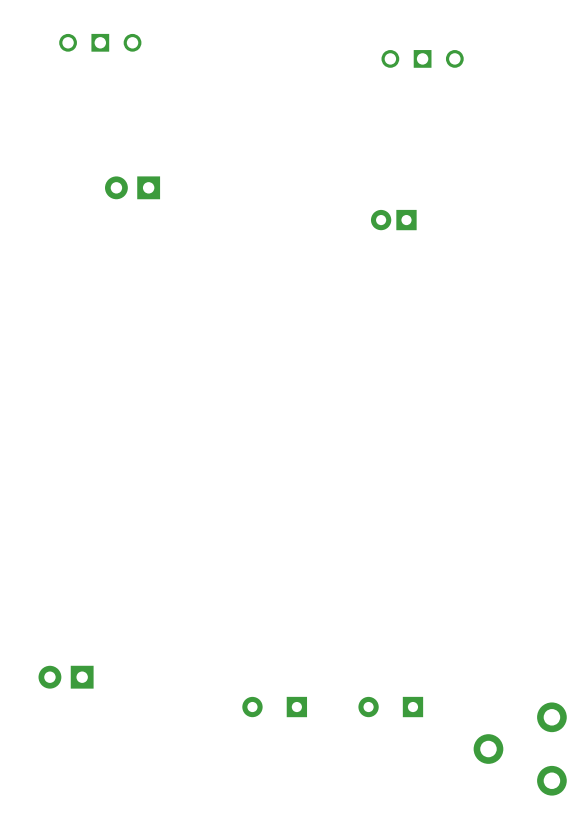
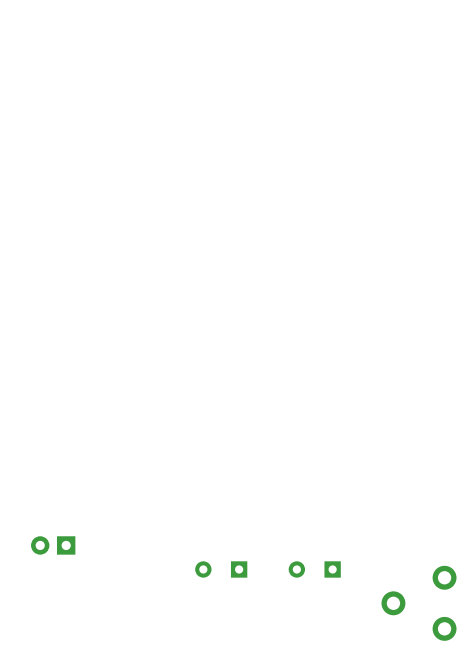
part: (100, 42) -> none
part: (422, 58) -> none
part: (132, 187) -> none
part: (393, 220) -> none

